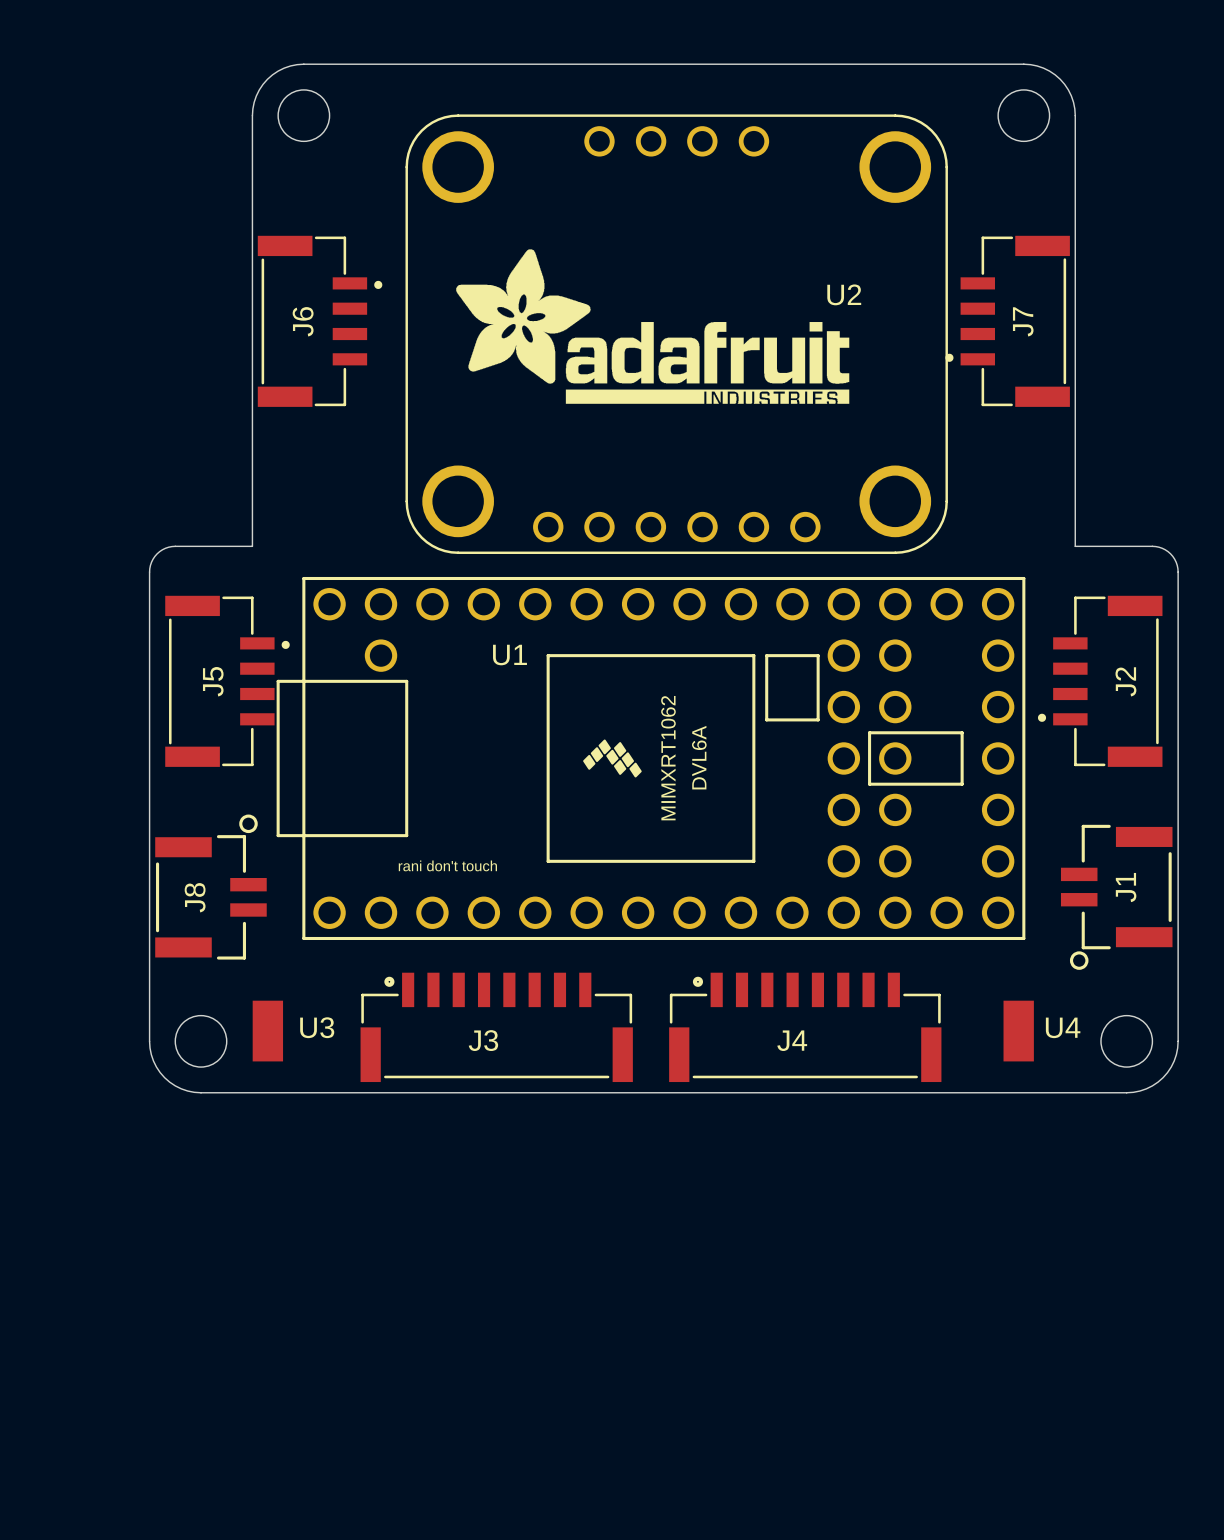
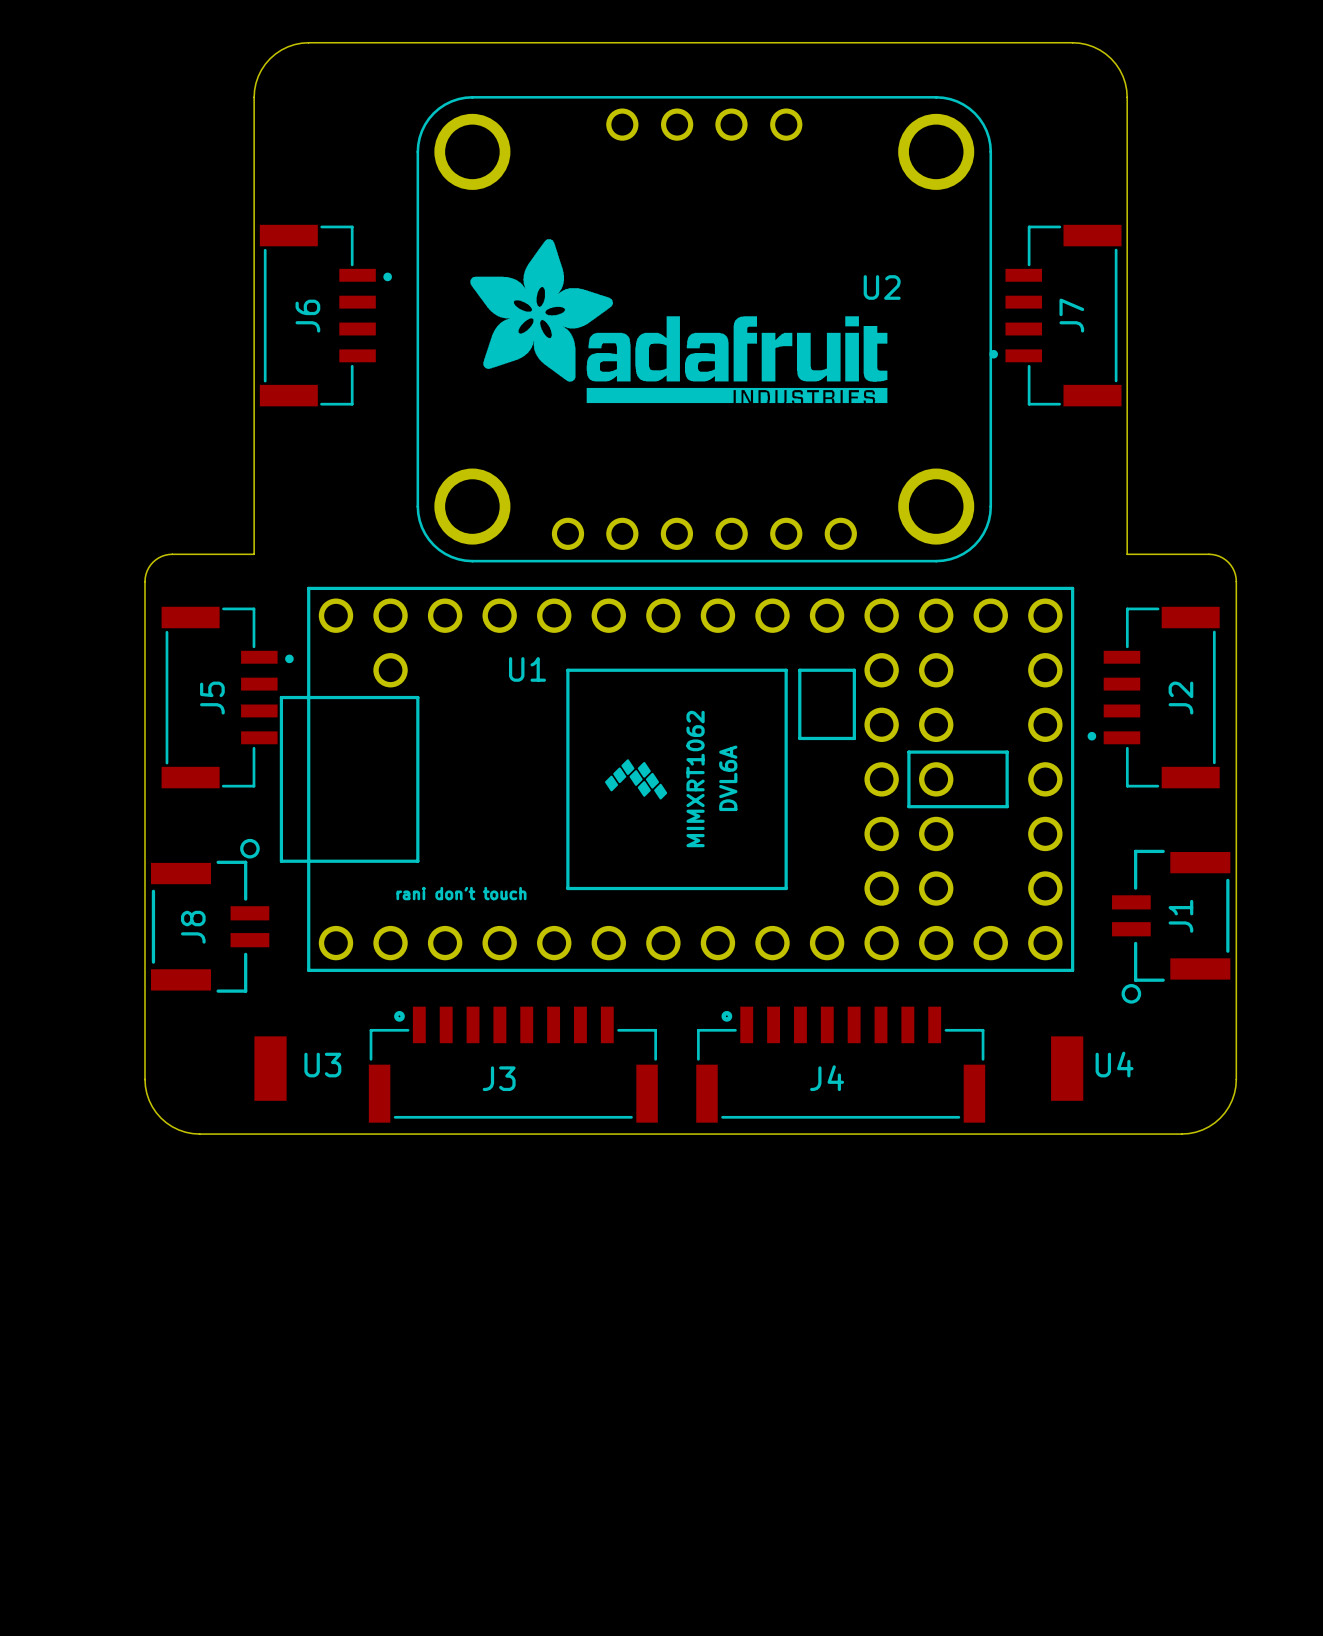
round board edge: [277, 89, 331, 142] -> none
round board edge: [997, 89, 1051, 142] -> none
round board edge: [174, 1015, 228, 1068] -> none
round board edge: [1100, 1015, 1153, 1068] -> none

